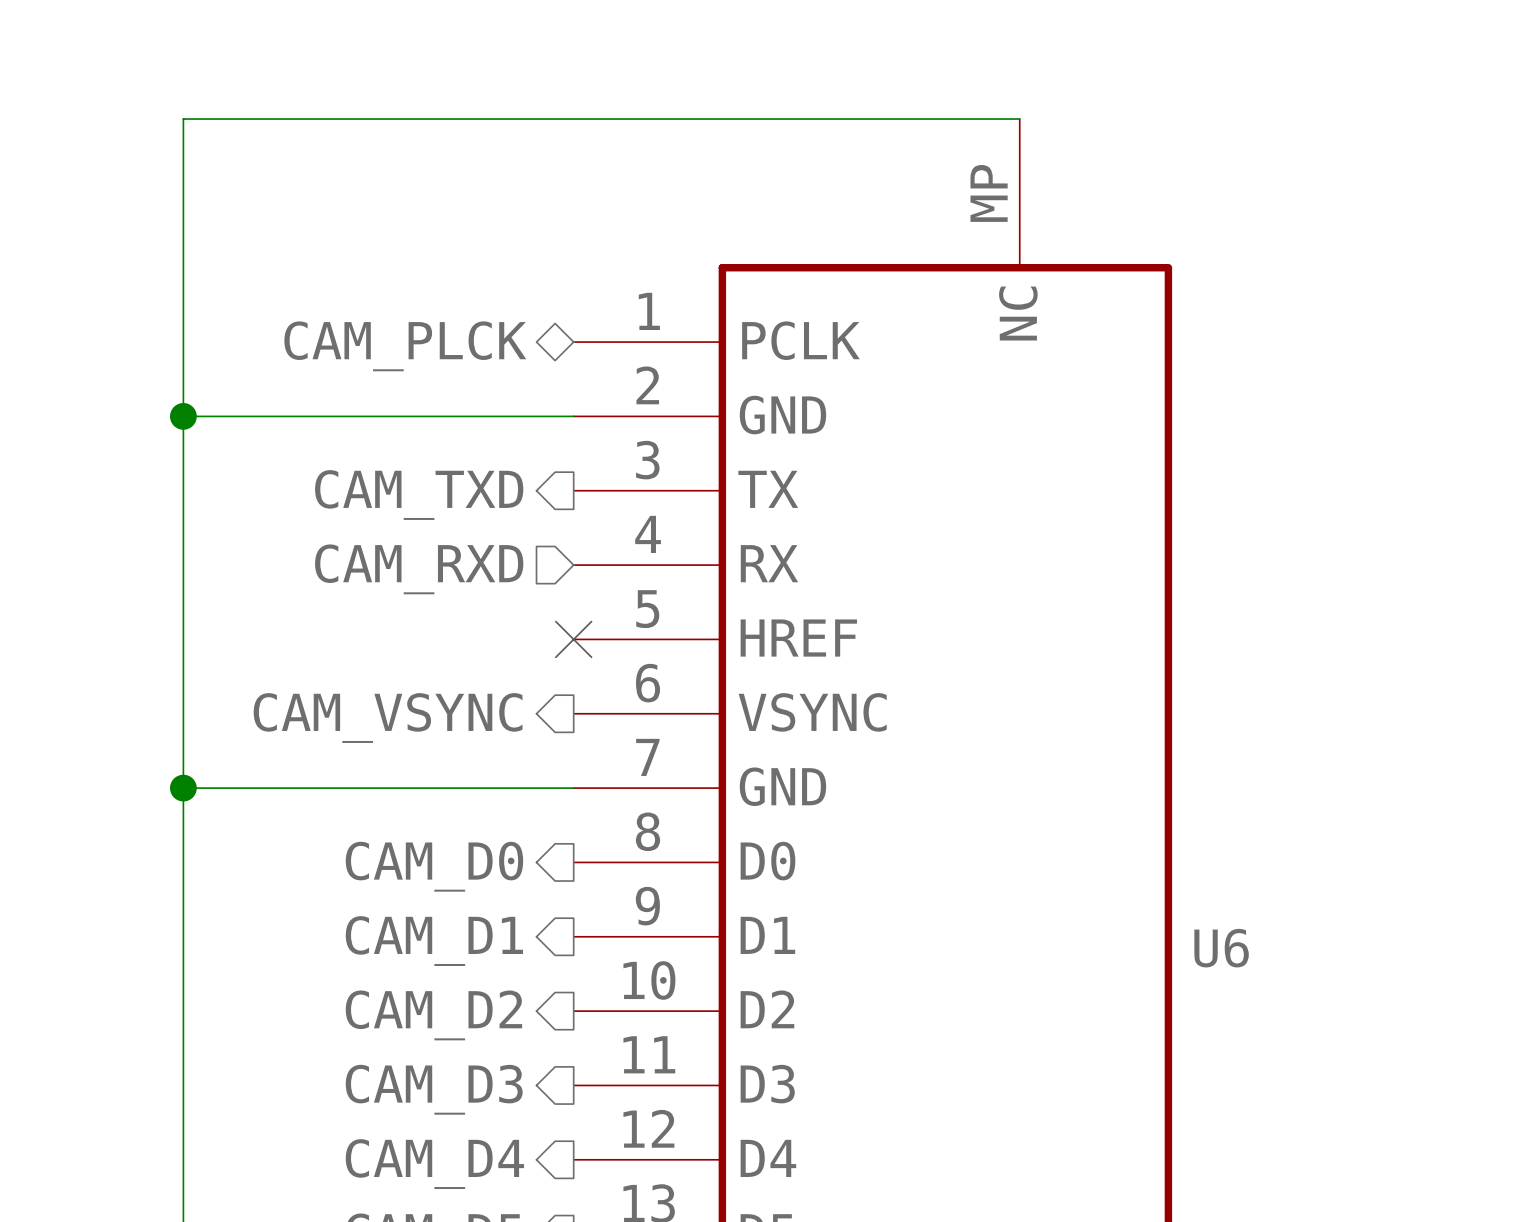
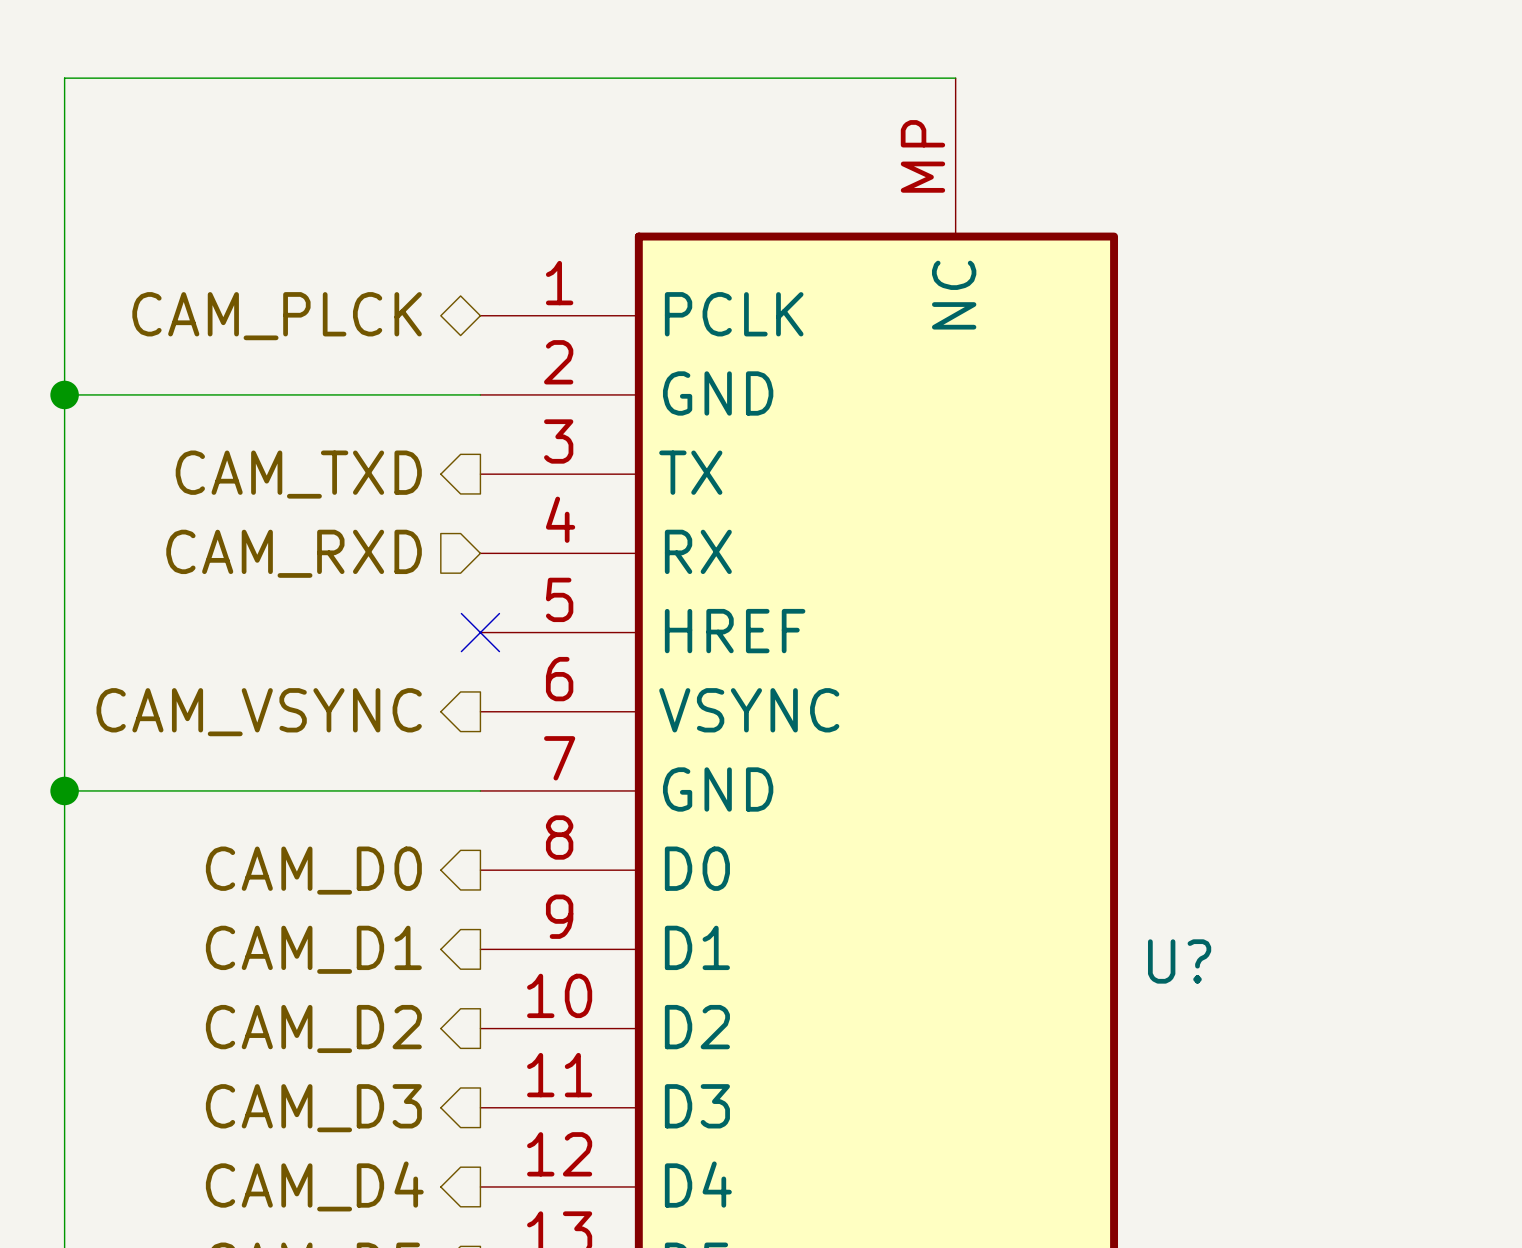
U6 name: U6 (1221, 948) -> U? (1179, 961)

